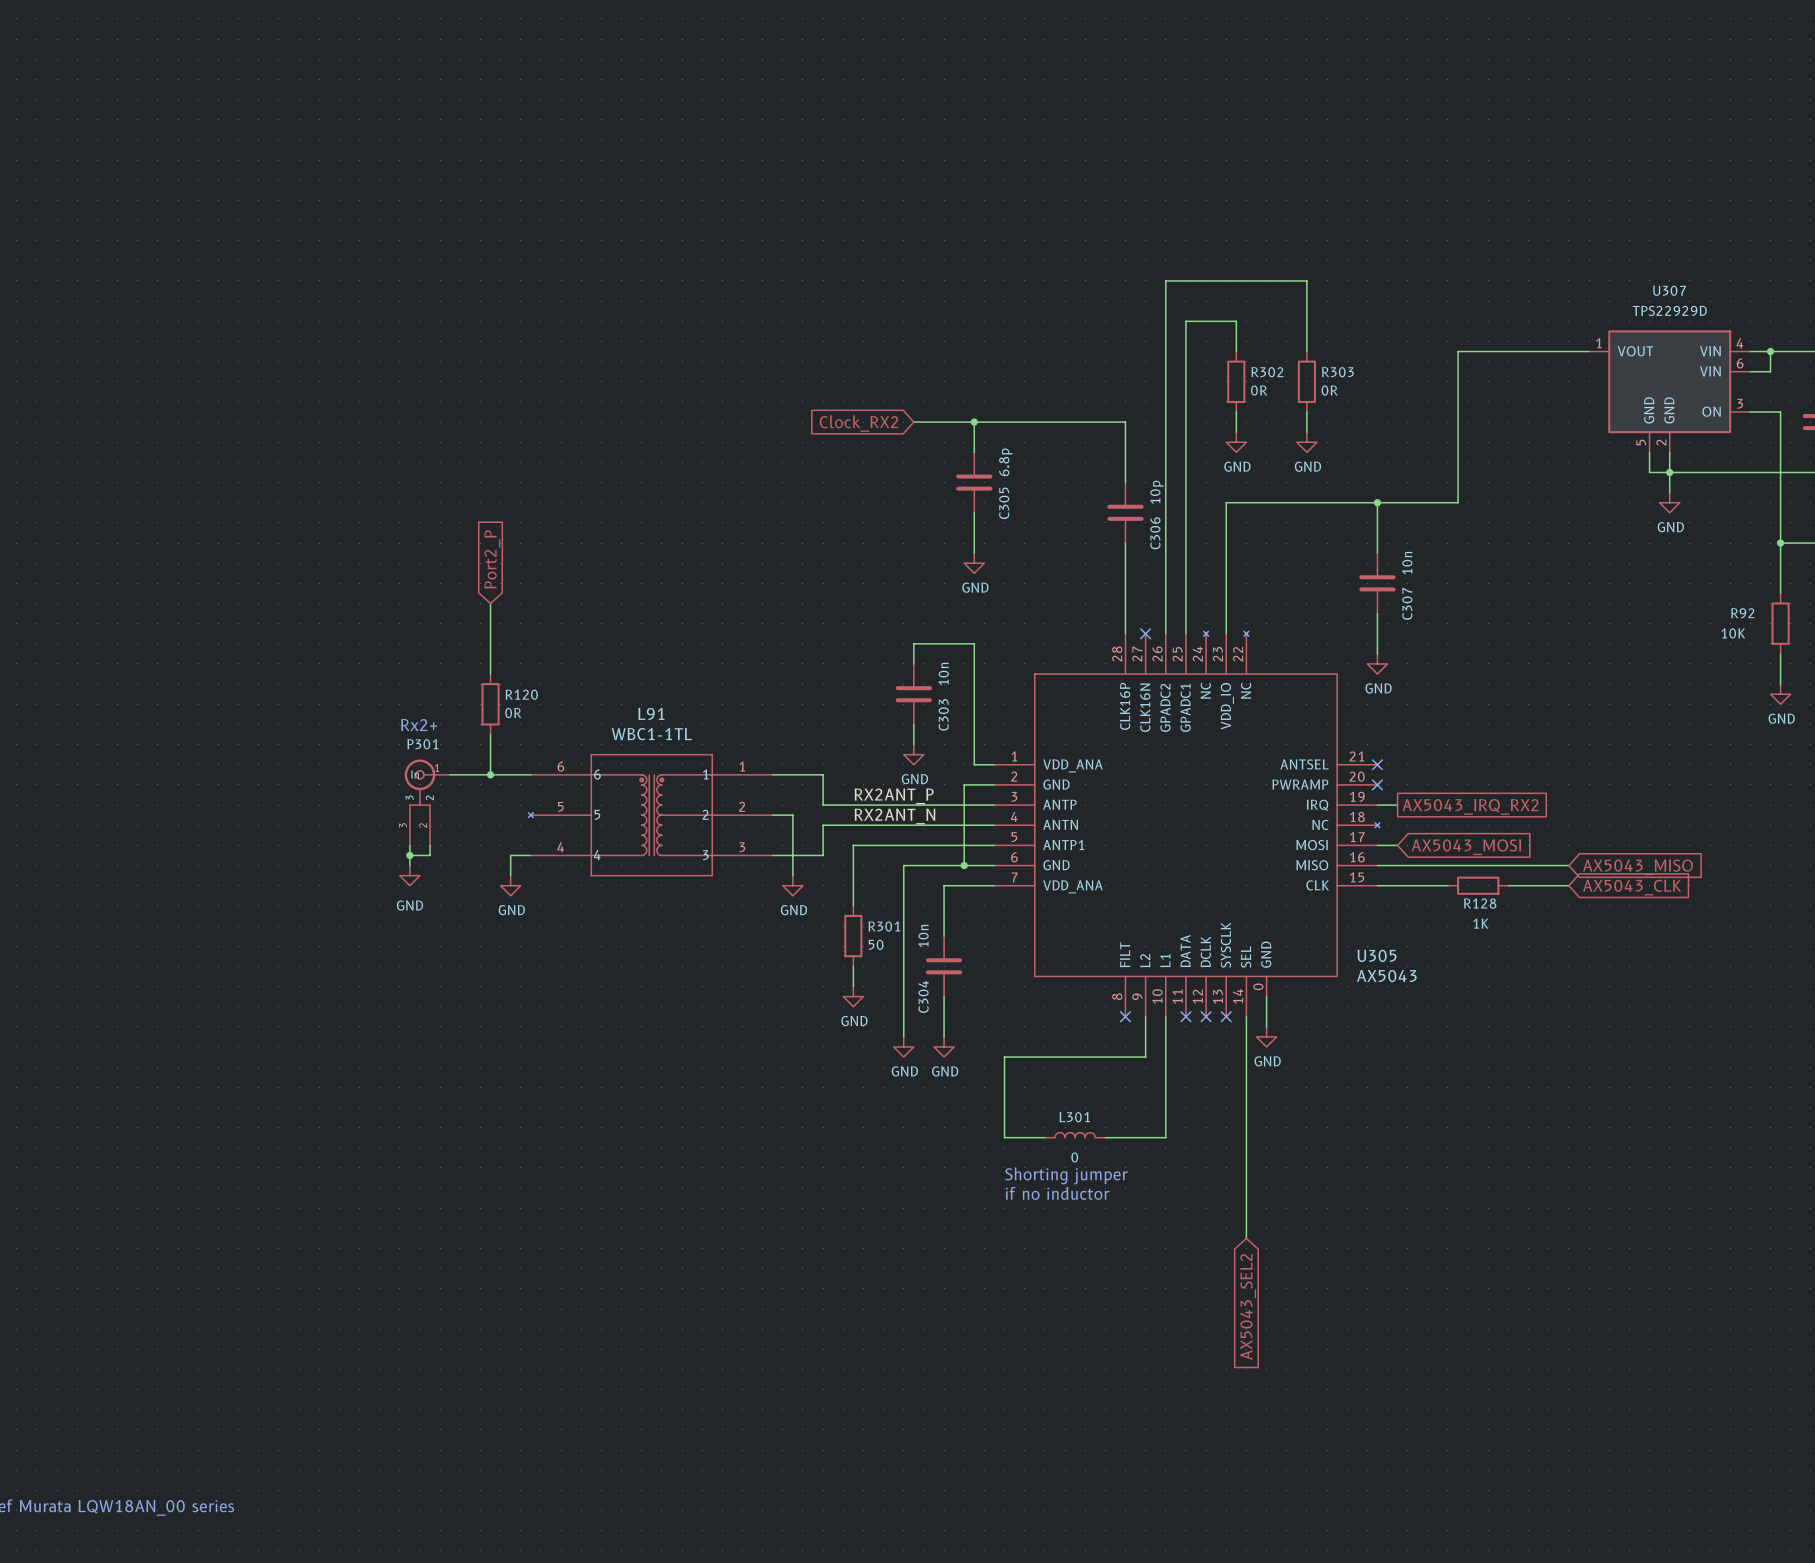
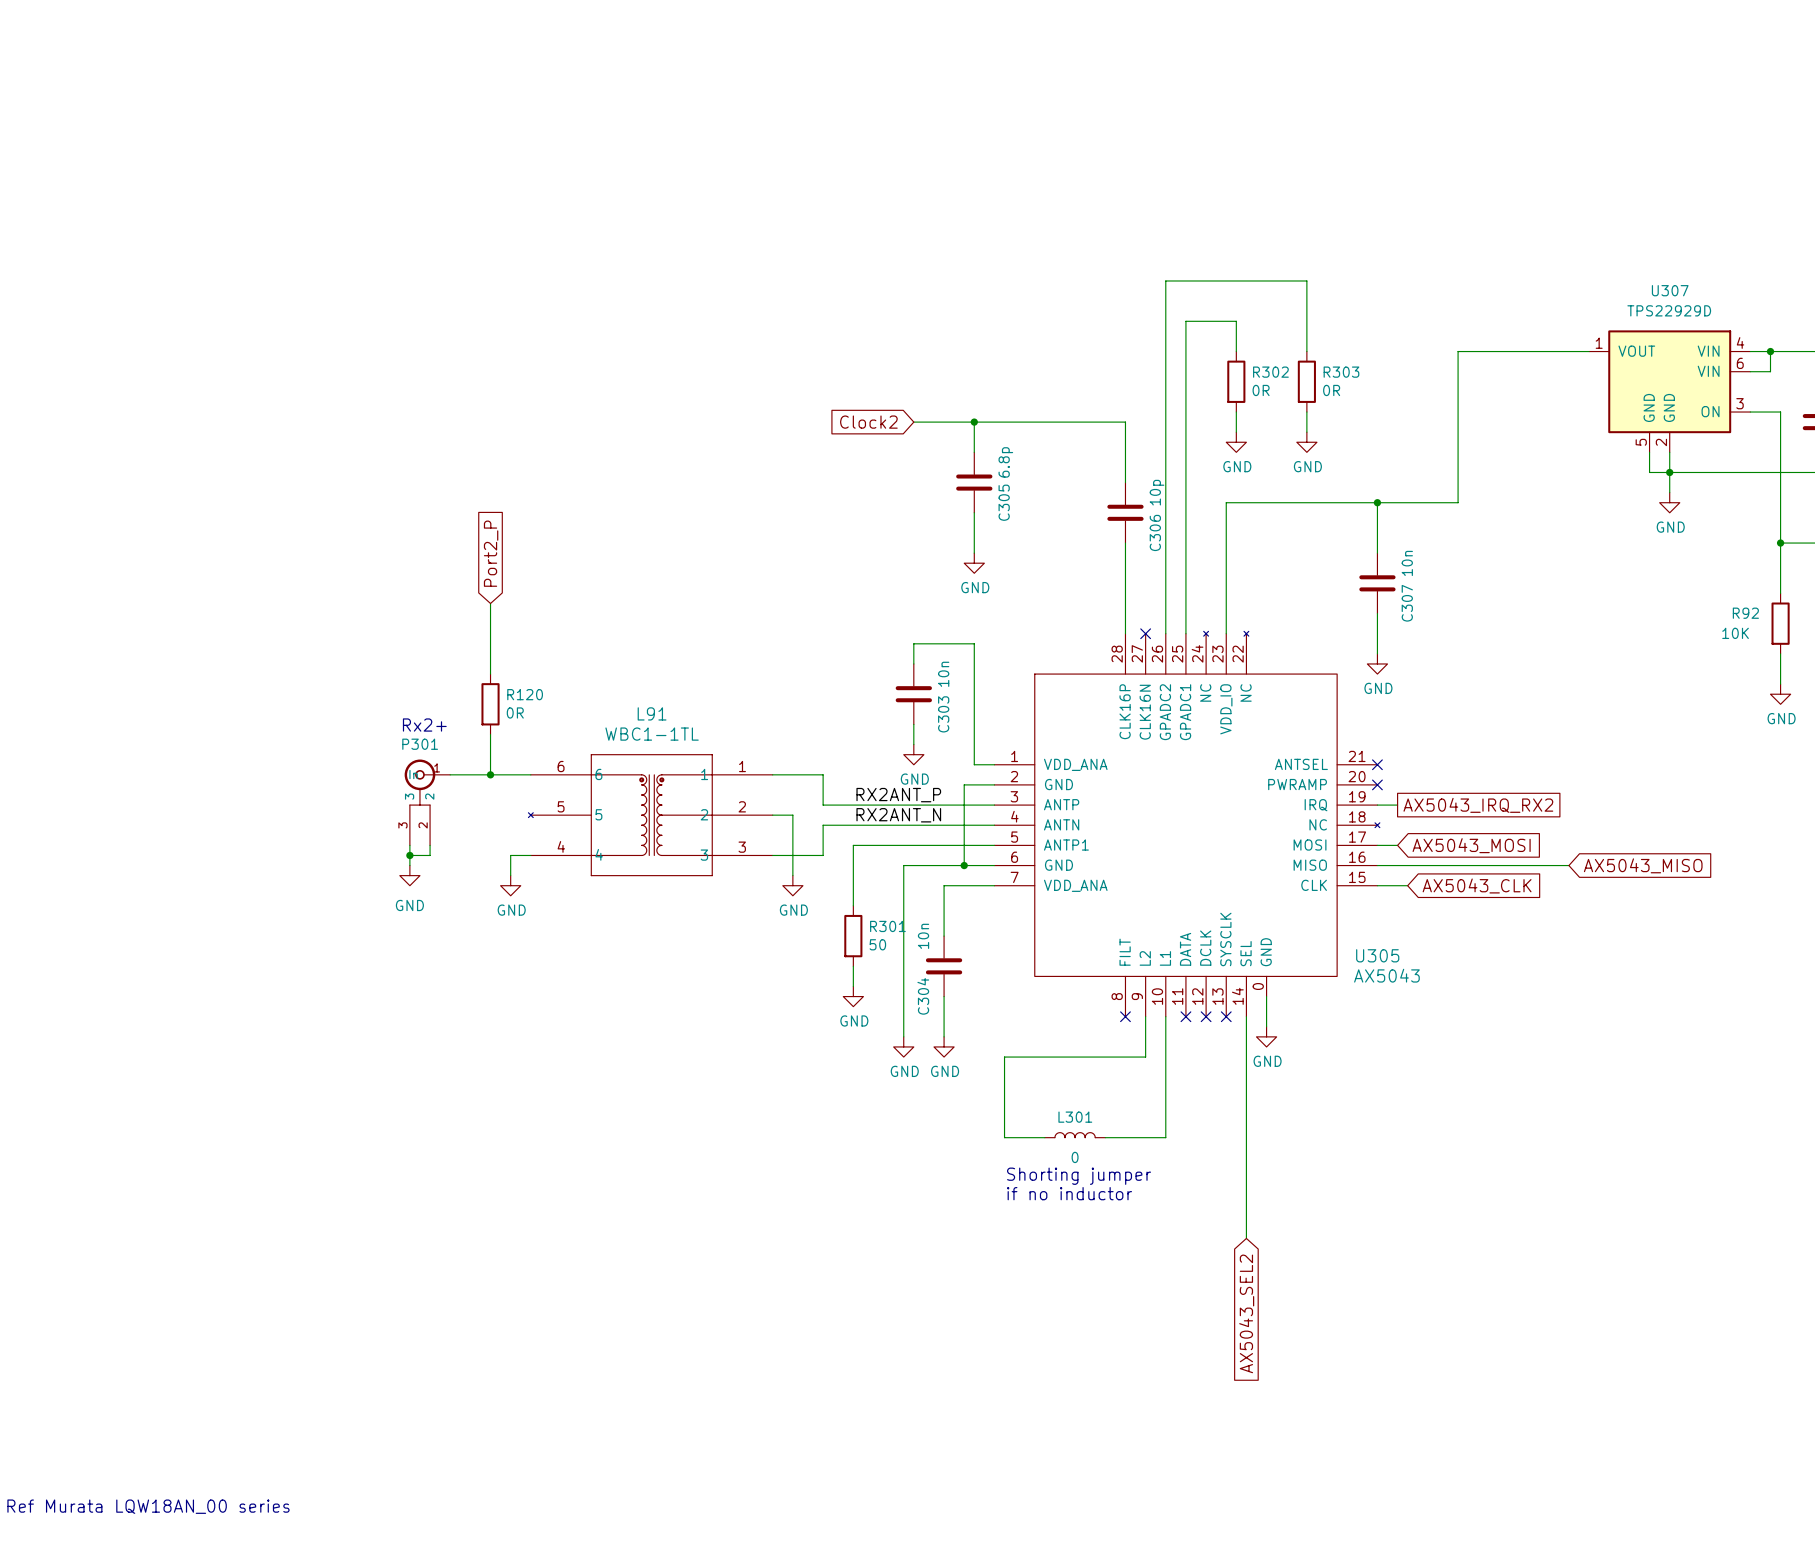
global label: Clock_RX2 (859, 423) -> Clock2 (868, 422)
wire: (1407, 885) (1447, 885) -> none
R128: 1K (1478, 885) -> none
wire: (1508, 885) (1568, 885) -> none
global label position: AX5043_CLK (1632, 887) -> AX5043_CLK (1477, 885)

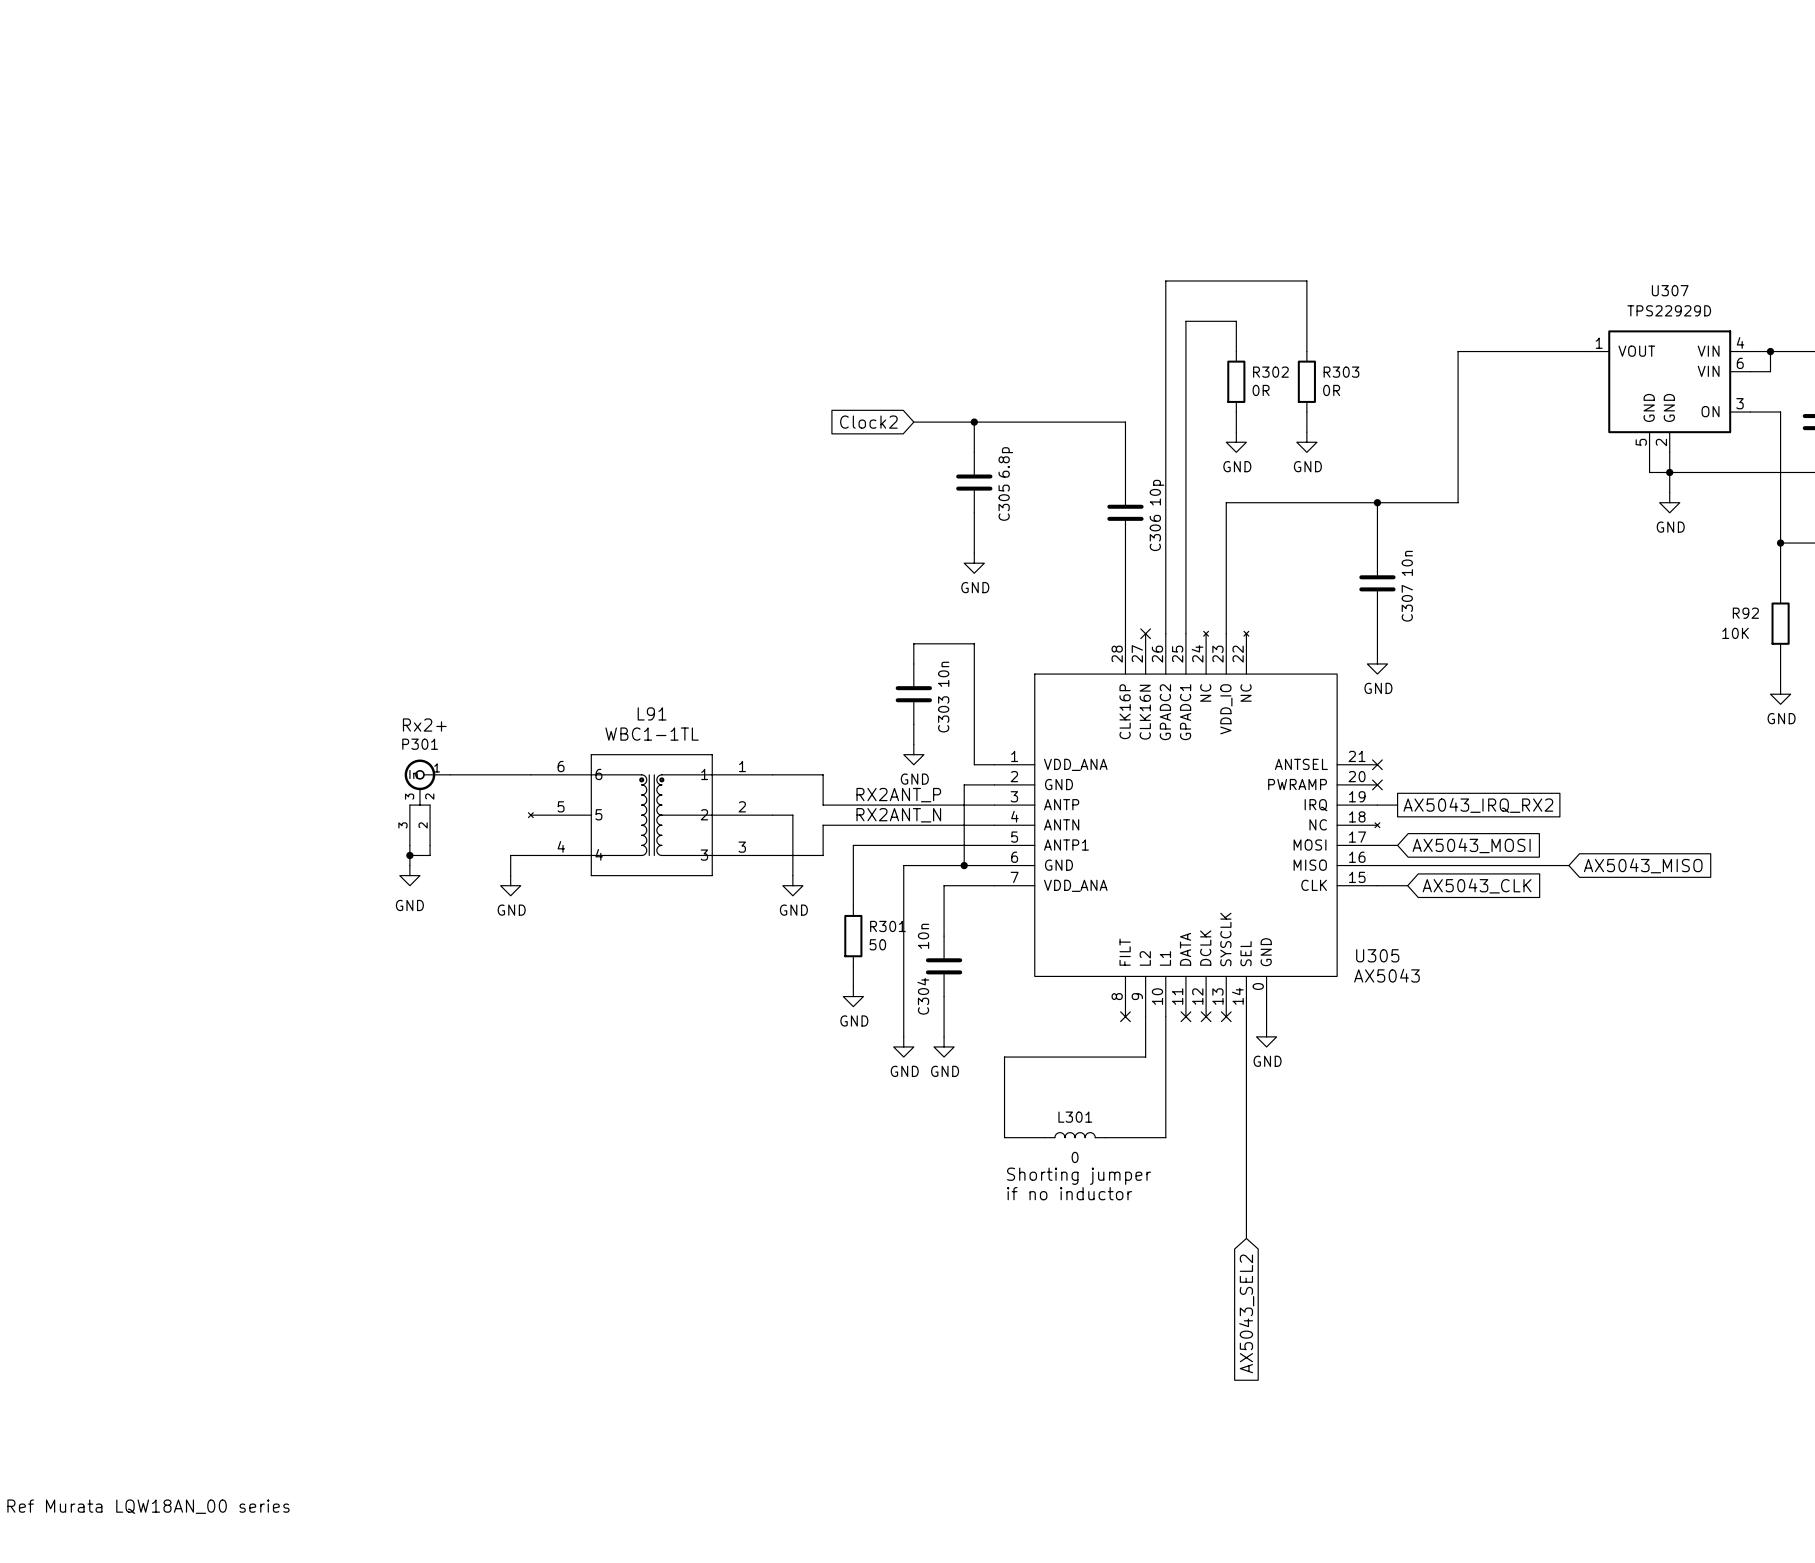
global label: Port2_P (491, 553) -> none
wire: (490, 603) (490, 674) -> none
R120: 0R (490, 704) -> none
wire: (490, 734) (490, 774) -> none
junction: (490, 774) -> none

